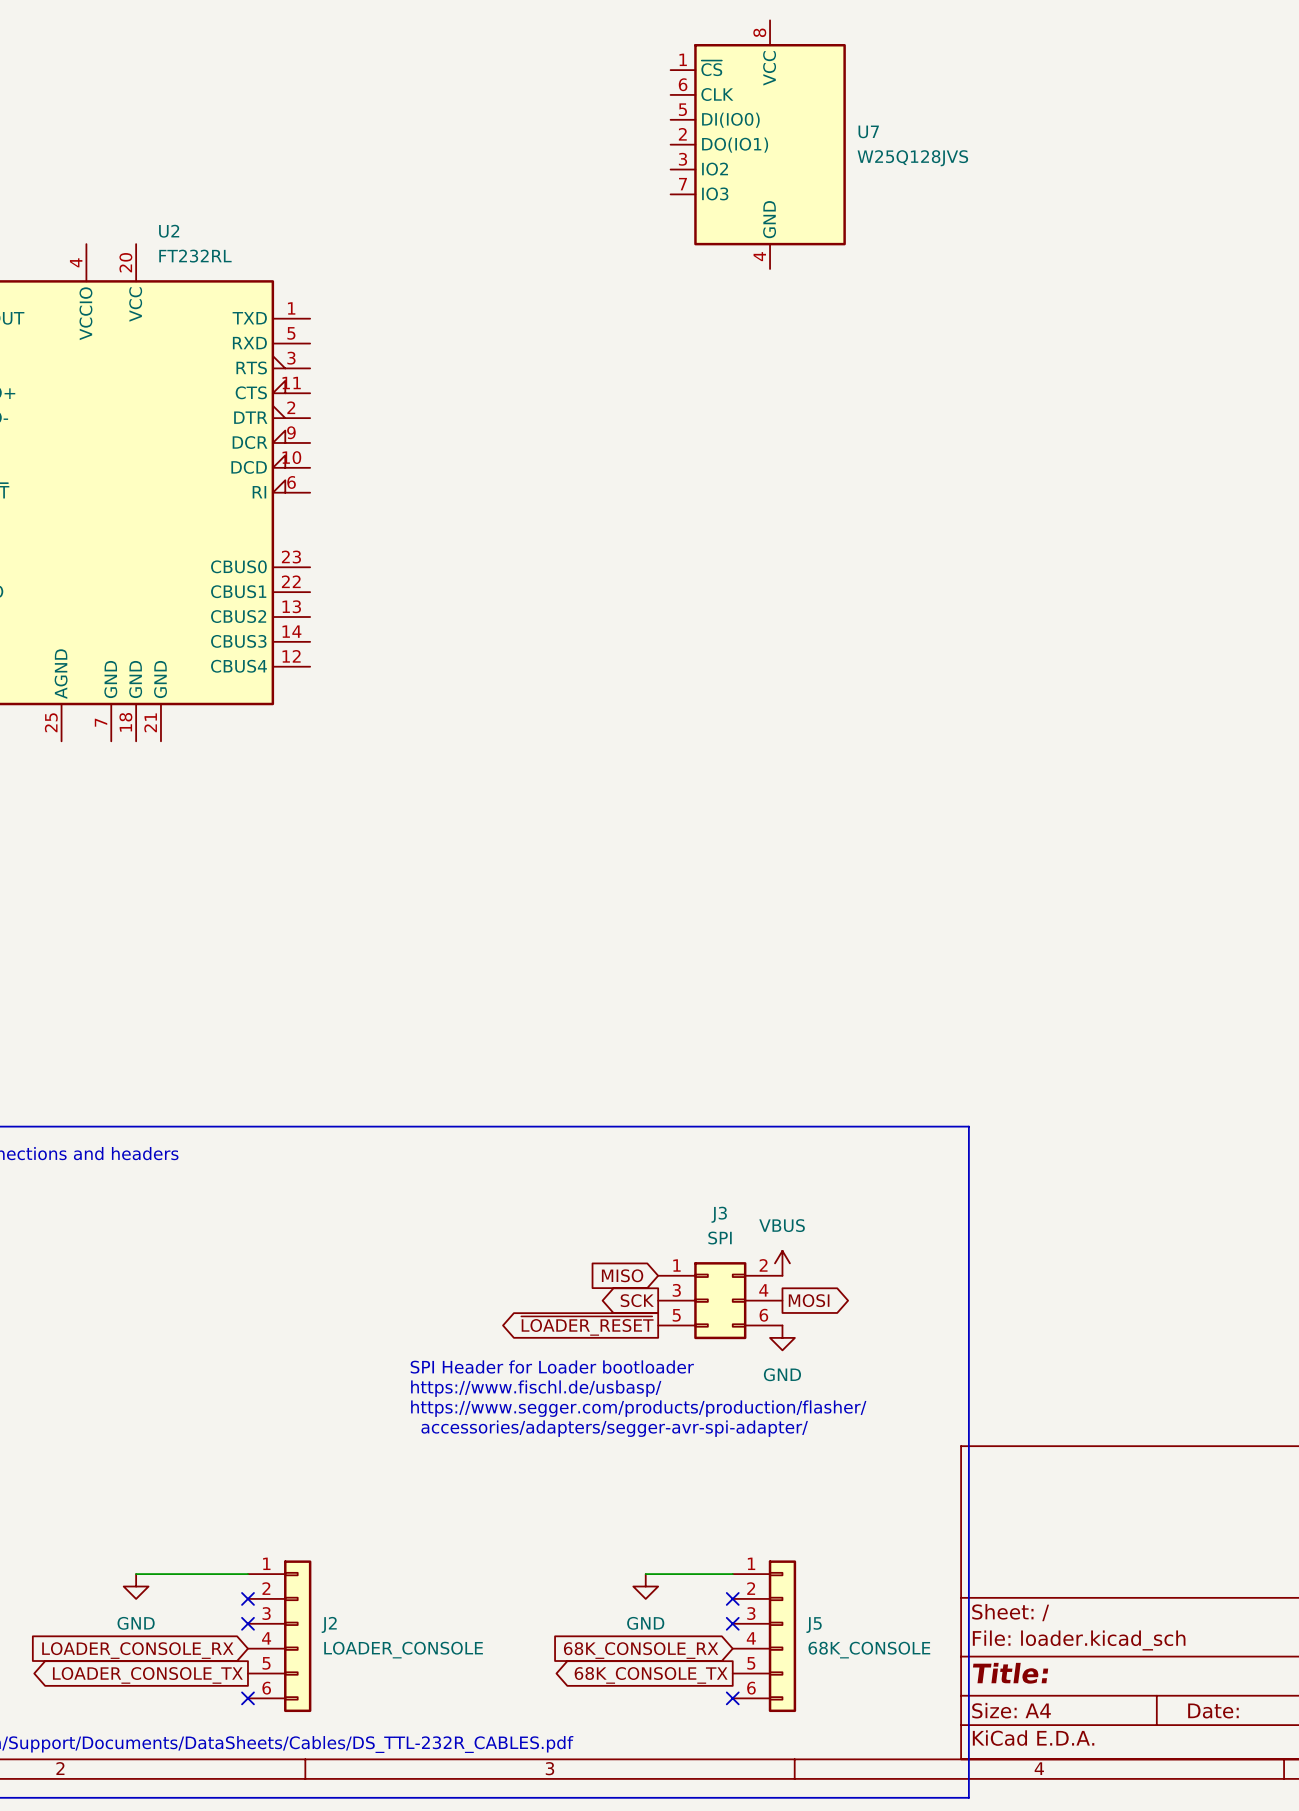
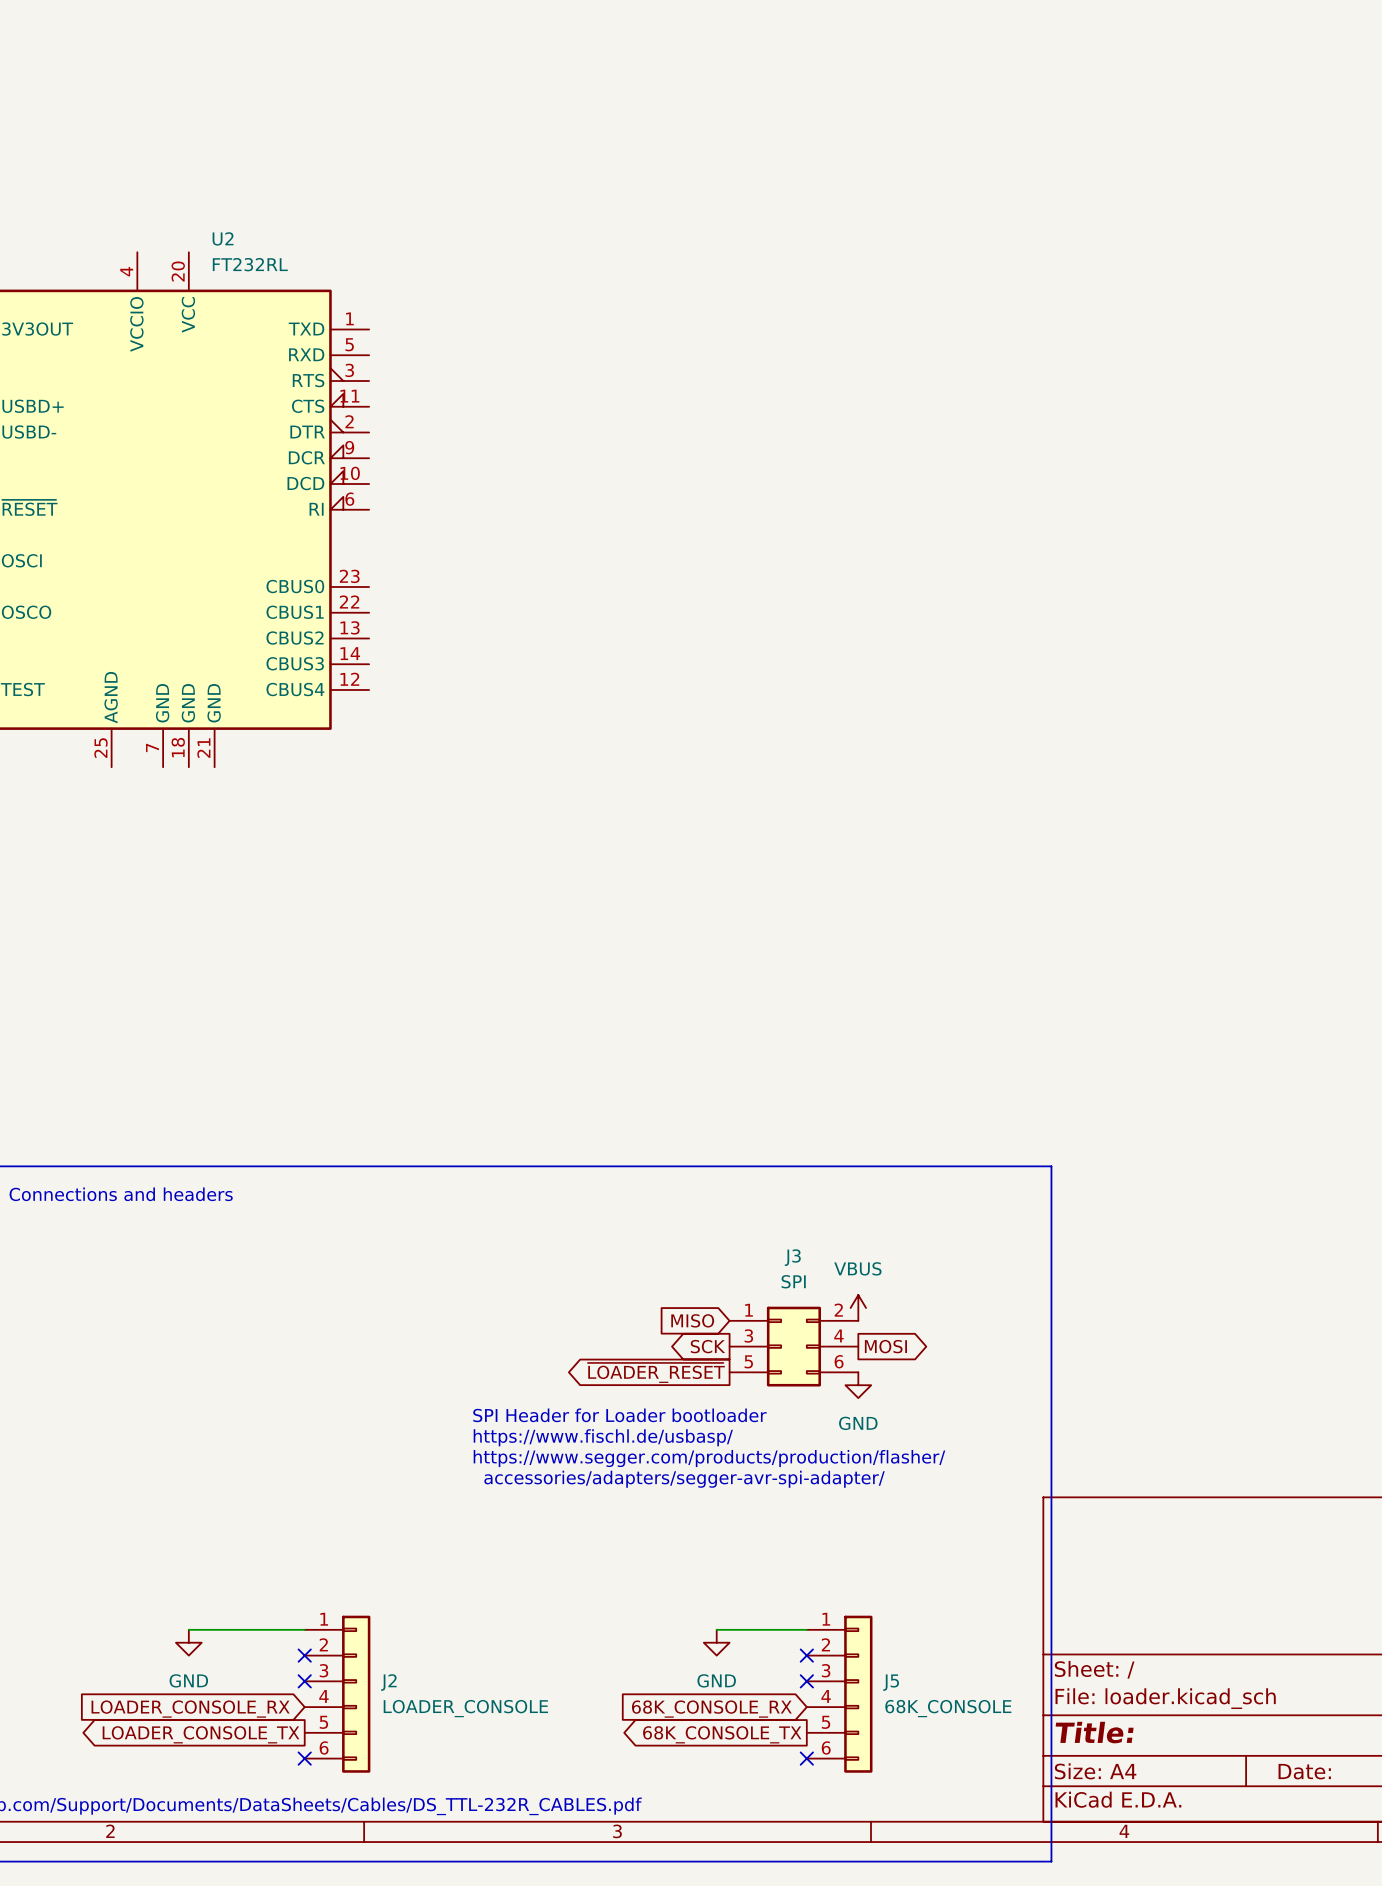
U7: W25Q128JVS (758, 144) -> none

